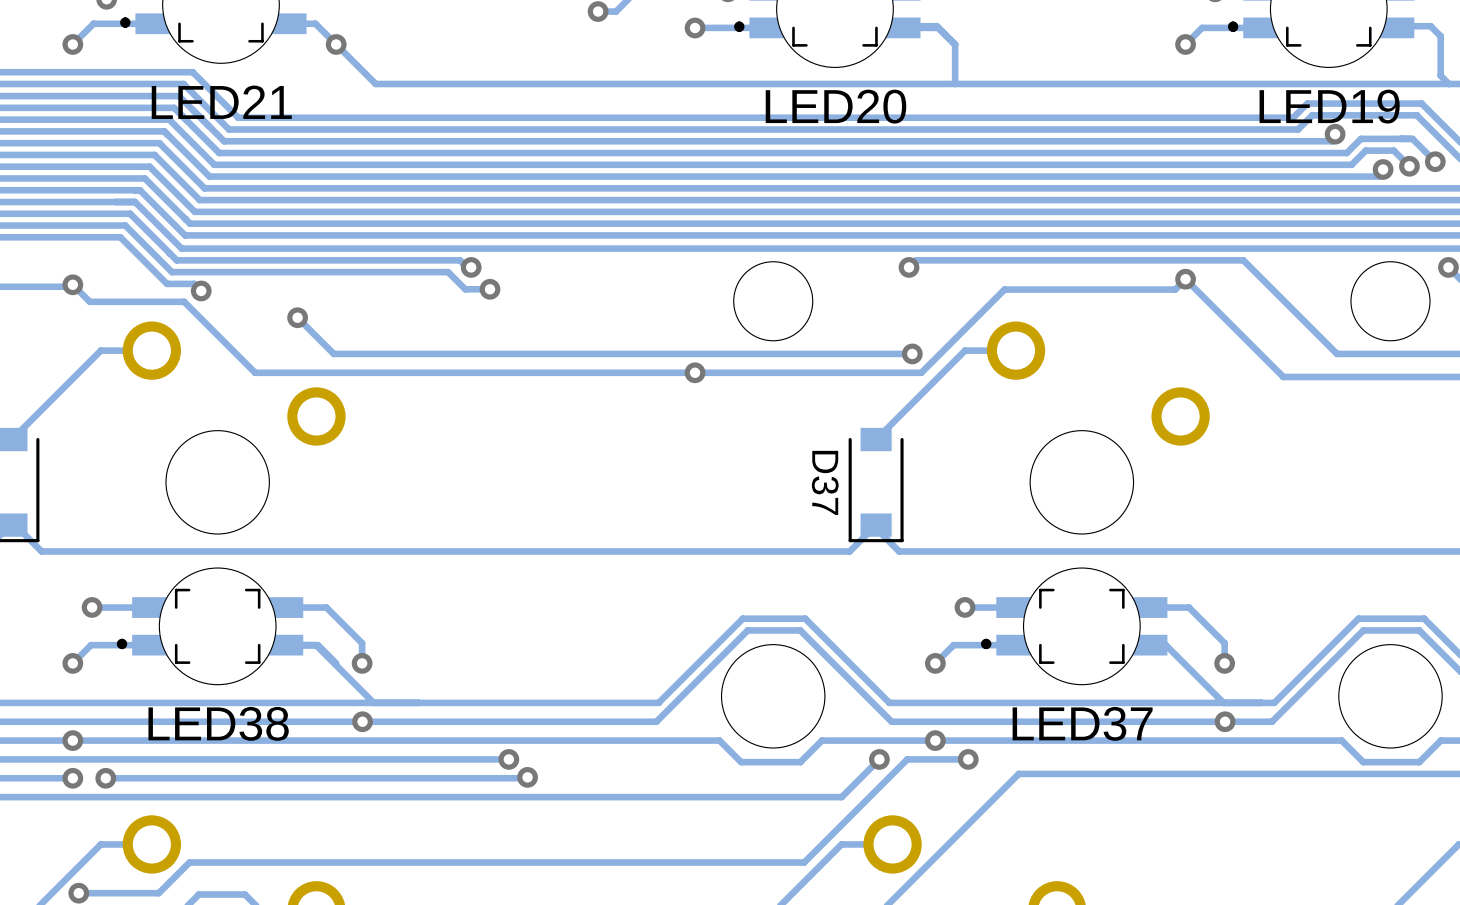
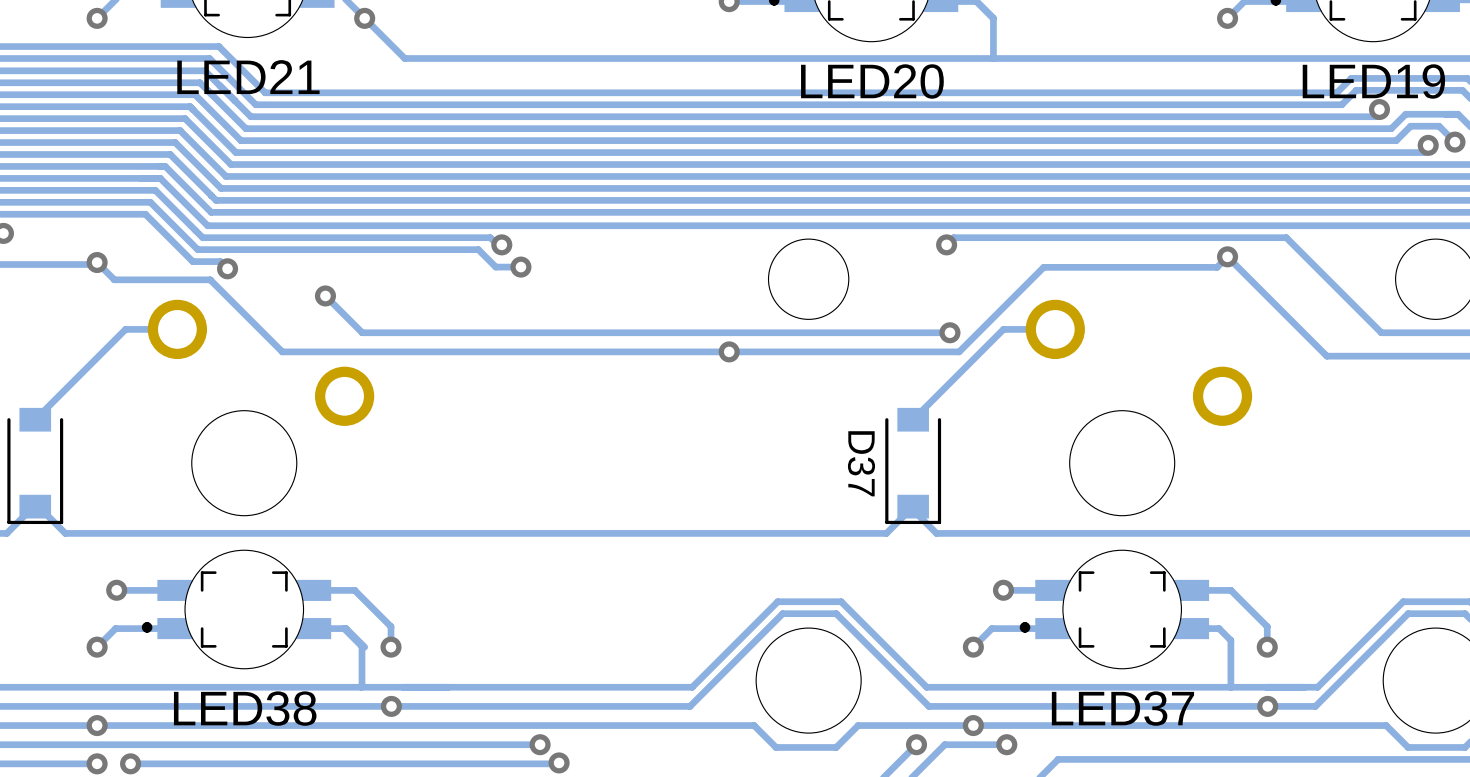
track: (1165, 645) (1223, 702) -> (1207, 628) (1219, 628) (1230, 640) (1230, 687)
track: (333, 662) (373, 702) -> (362, 646) (361, 687)

